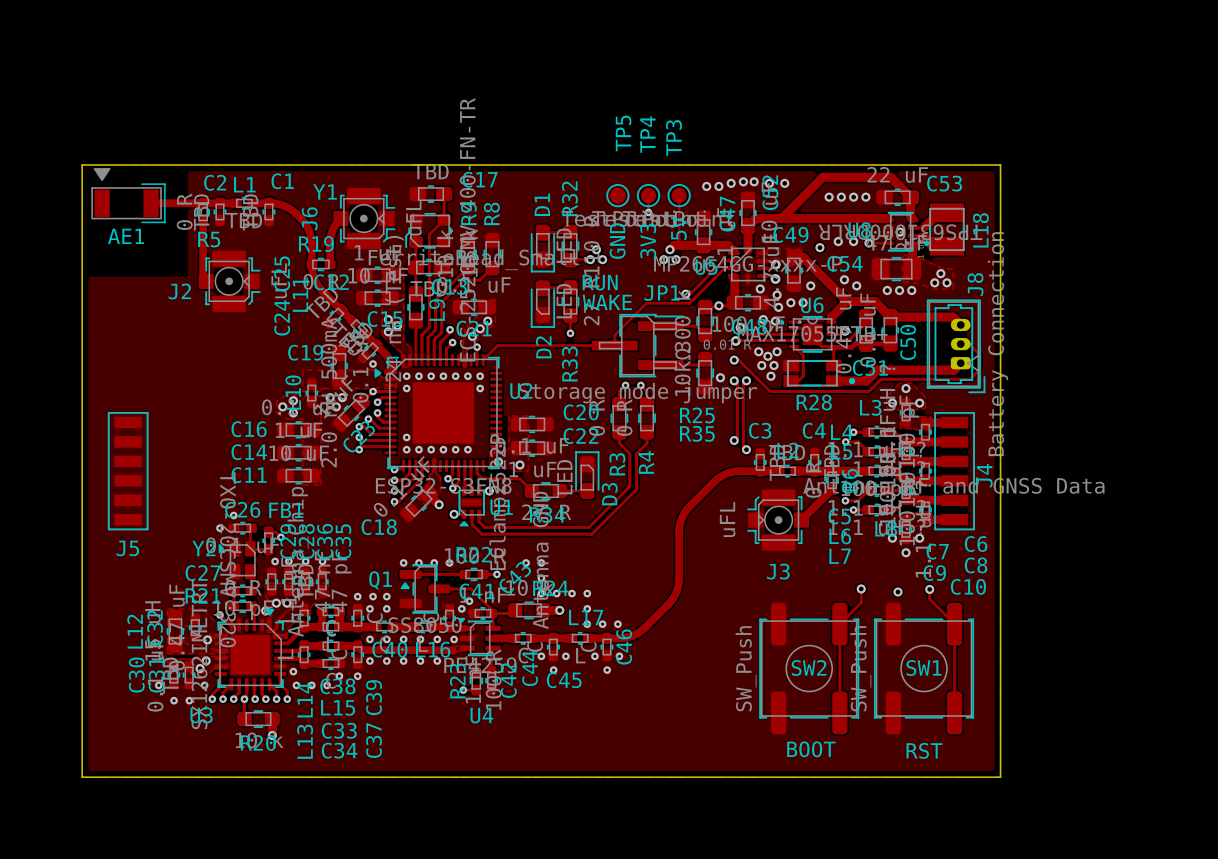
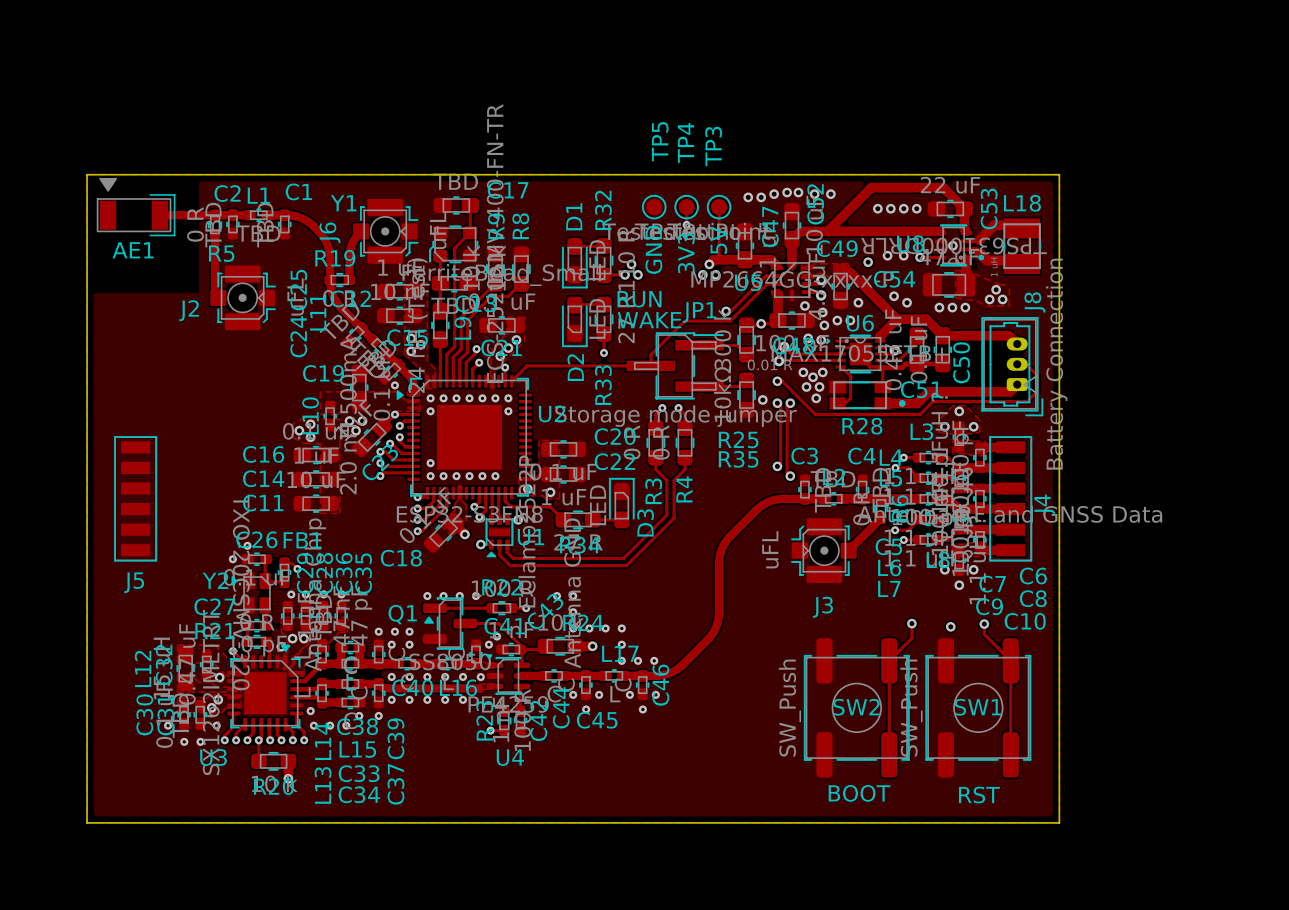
C53 name rotation: 0° (944, 183) -> 90° counterclockwise (989, 209)
L18 position: (946, 229) -> (1022, 246)
L18 name rotation: 0° (980, 230) -> 90° clockwise (1022, 203)

